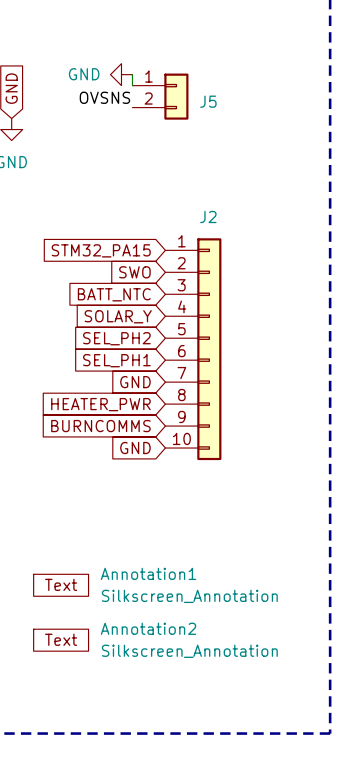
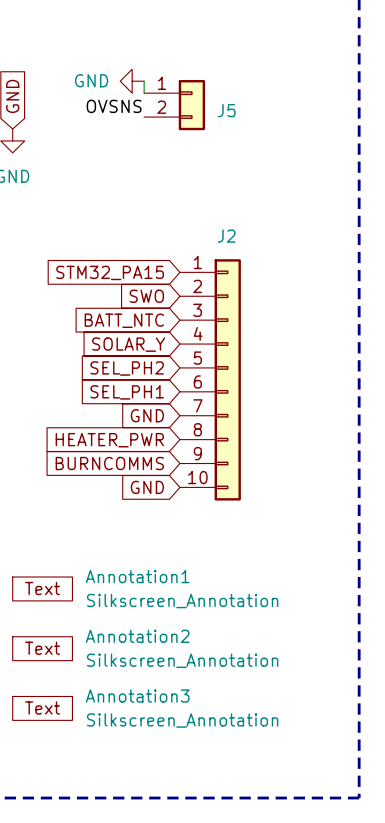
Annotation1 position: (61, 585) -> (42, 588)
Annotation2 position: (61, 640) -> (42, 648)
Annotation3: none -> Silkscreen_Annotation (42, 708)

